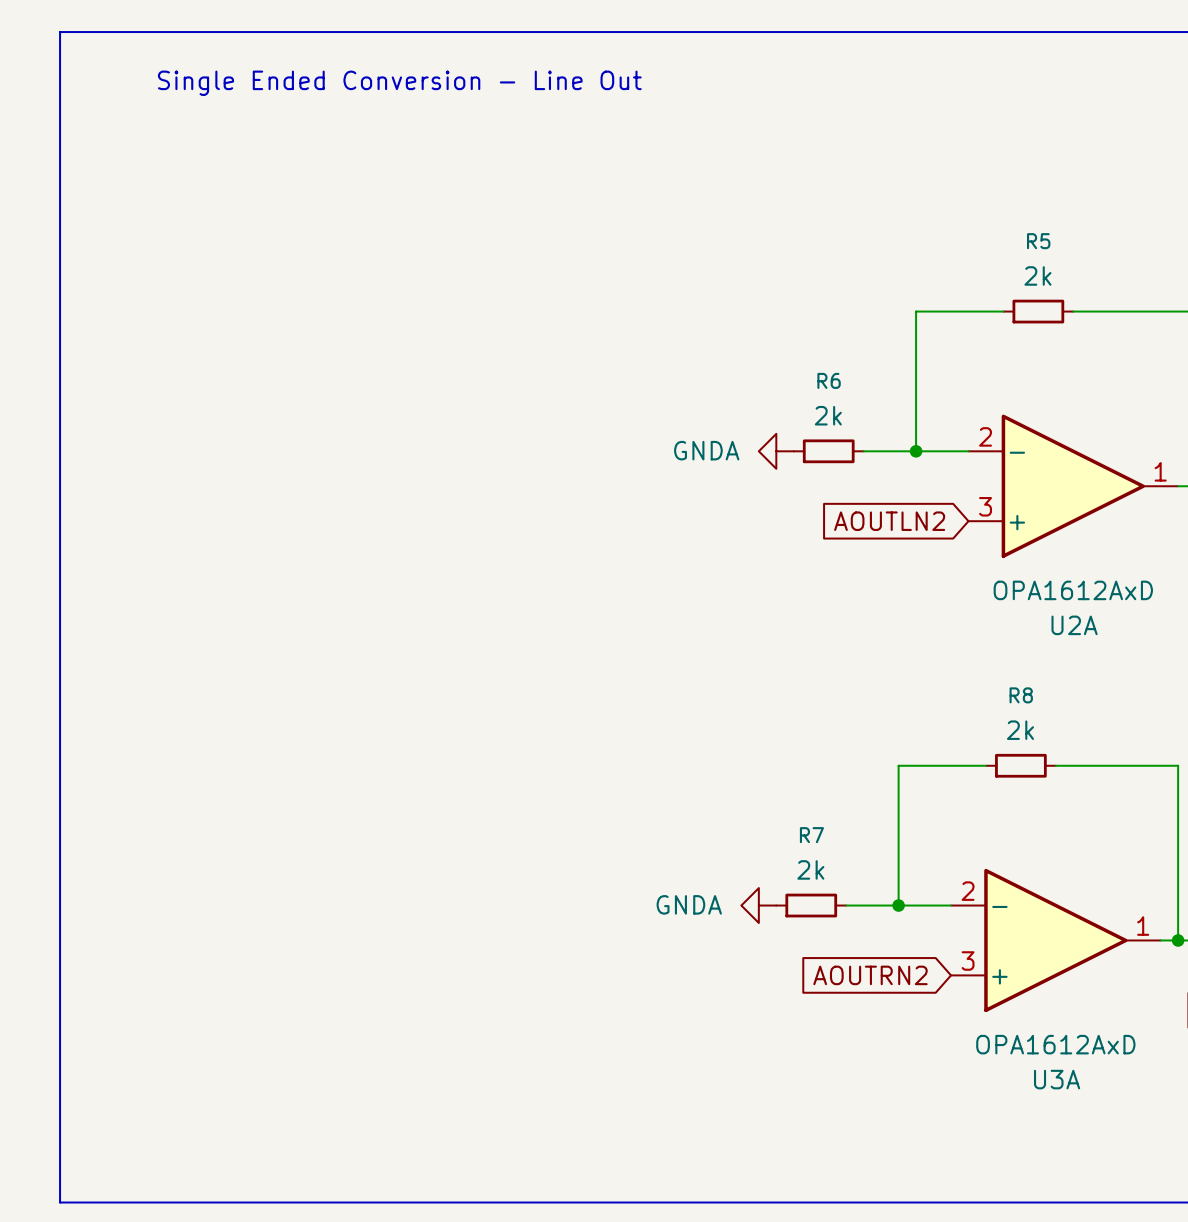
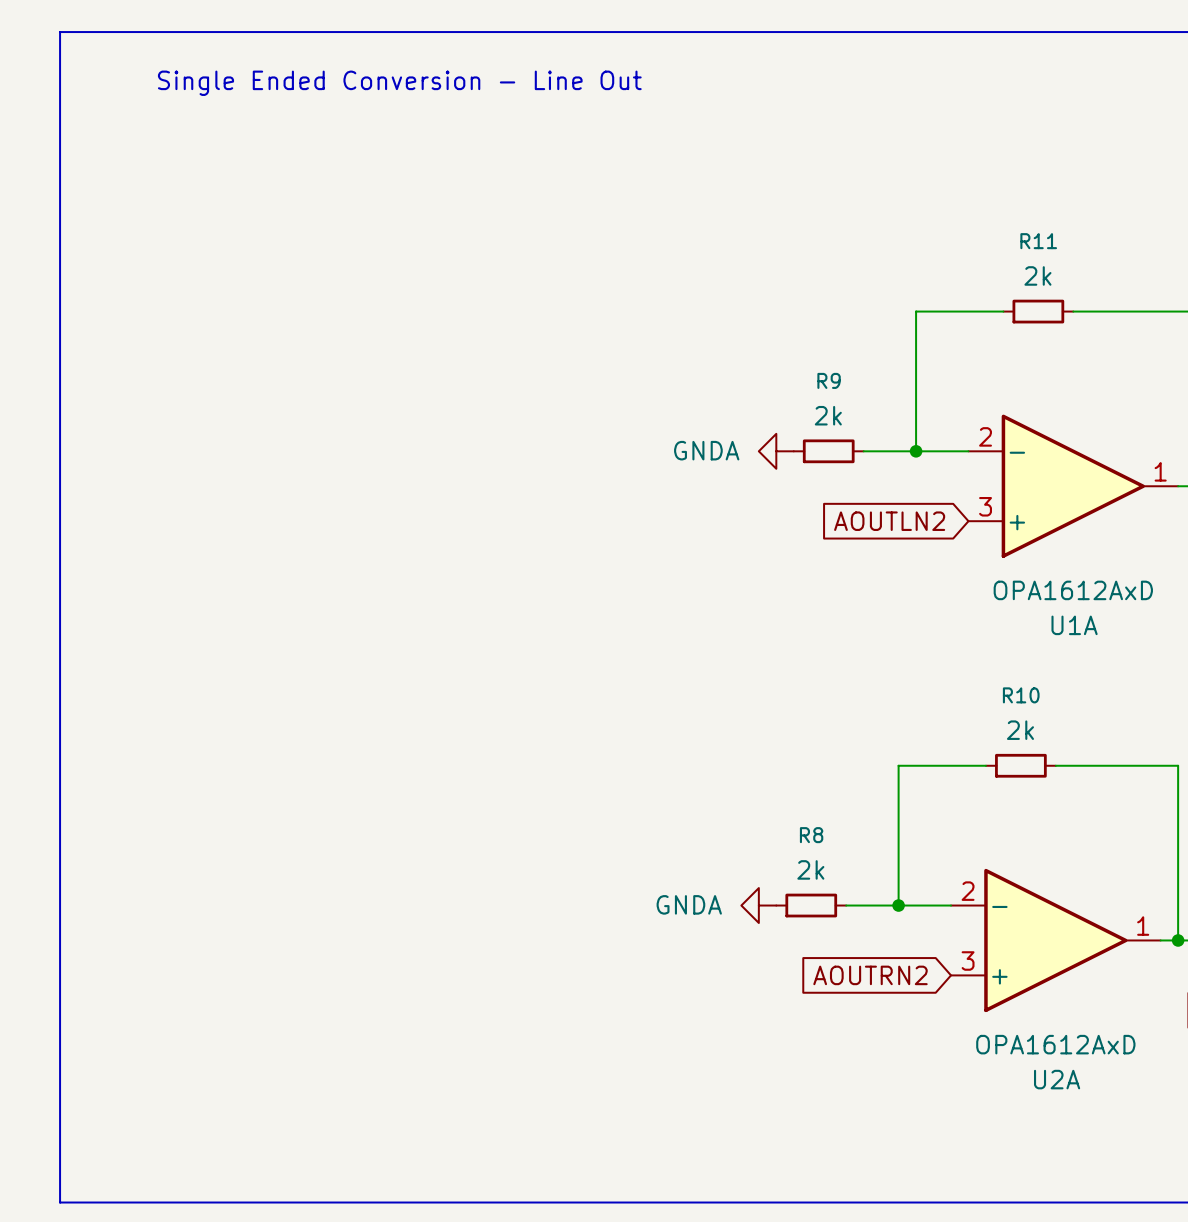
R5 name: R5 (1038, 241) -> R11 (1038, 241)
R6 name: R6 (829, 380) -> R9 (829, 380)
U2A name: U2A (1074, 625) -> U1A (1074, 625)
R8 name: R8 (1021, 695) -> R10 (1021, 695)
R7 name: R7 (811, 835) -> R8 (811, 835)
U3A name: U3A (1057, 1079) -> U2A (1057, 1079)

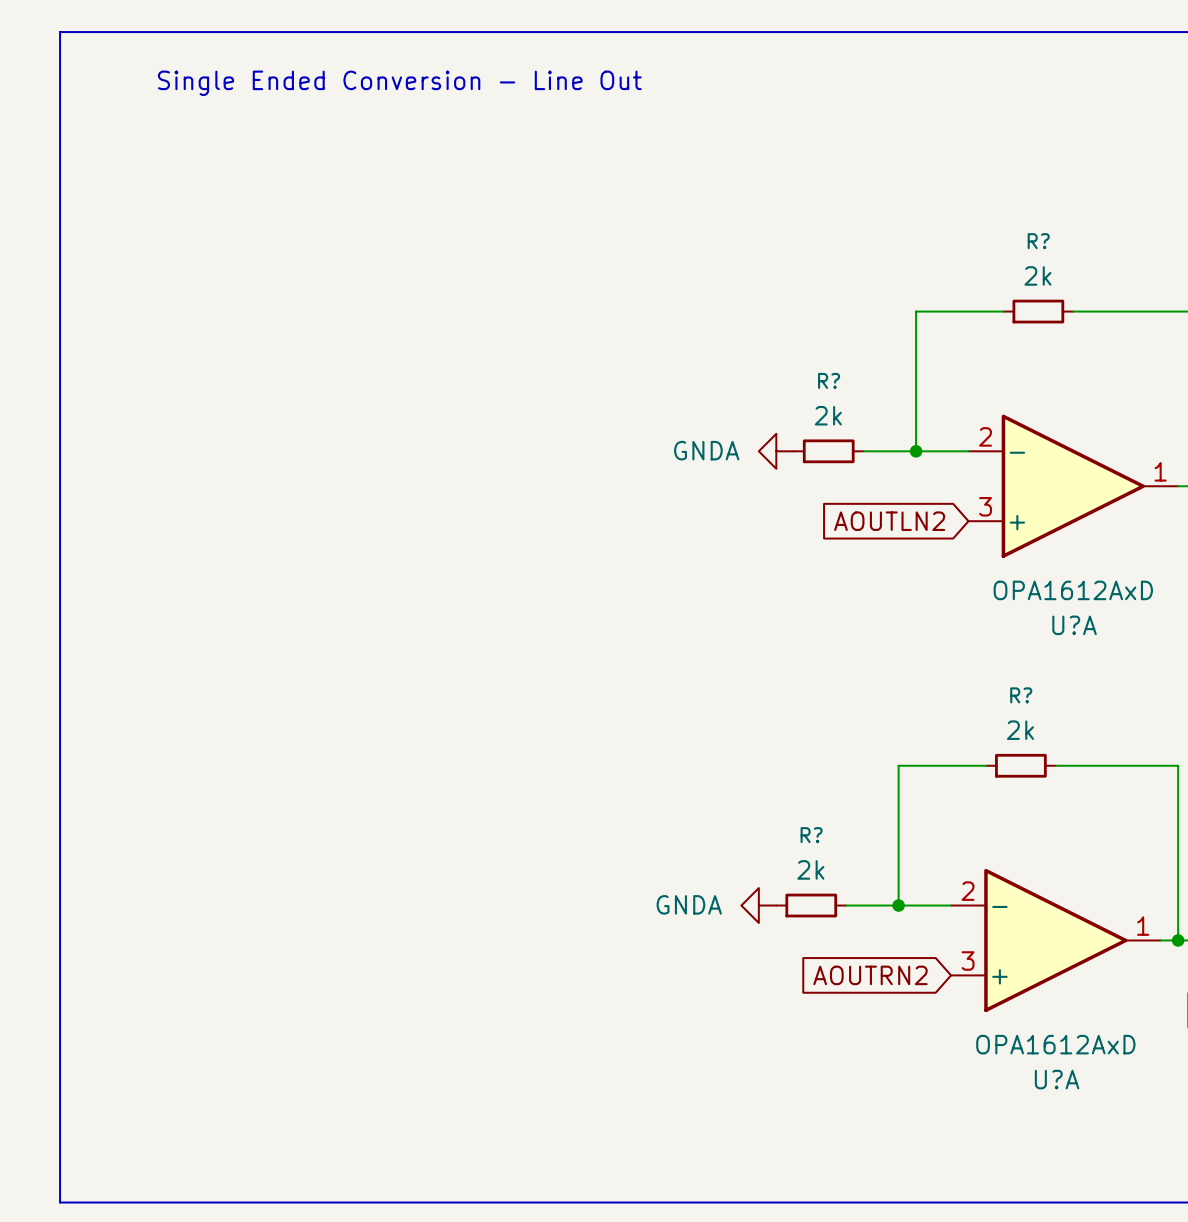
R11 name: R11 (1038, 241) -> R? (1038, 241)
R9 name: R9 (829, 380) -> R? (829, 380)
U1A name: U1A (1074, 625) -> U?A (1074, 625)
R10 name: R10 (1021, 695) -> R? (1021, 695)
R8 name: R8 (811, 835) -> R? (811, 835)
U2A name: U2A (1057, 1079) -> U?A (1057, 1079)

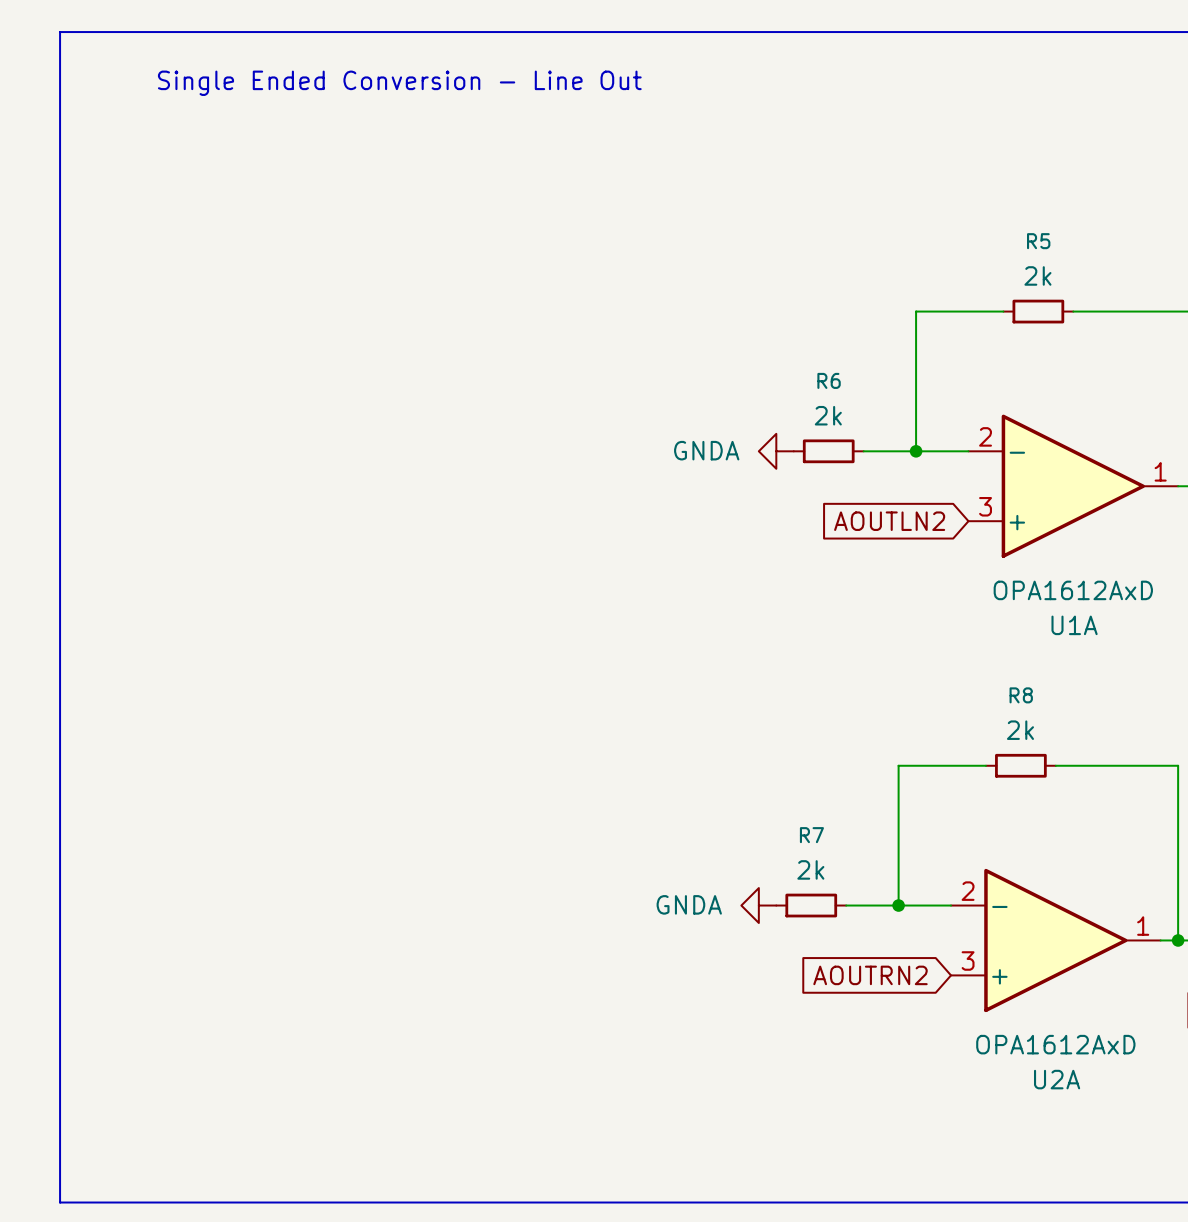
R? name: R? (1038, 241) -> R5 (1038, 241)
R? name: R? (829, 380) -> R6 (829, 380)
U?A name: U?A (1074, 625) -> U1A (1074, 625)
R? name: R? (1021, 695) -> R8 (1021, 695)
R? name: R? (811, 835) -> R7 (811, 835)
U?A name: U?A (1057, 1079) -> U2A (1057, 1079)

